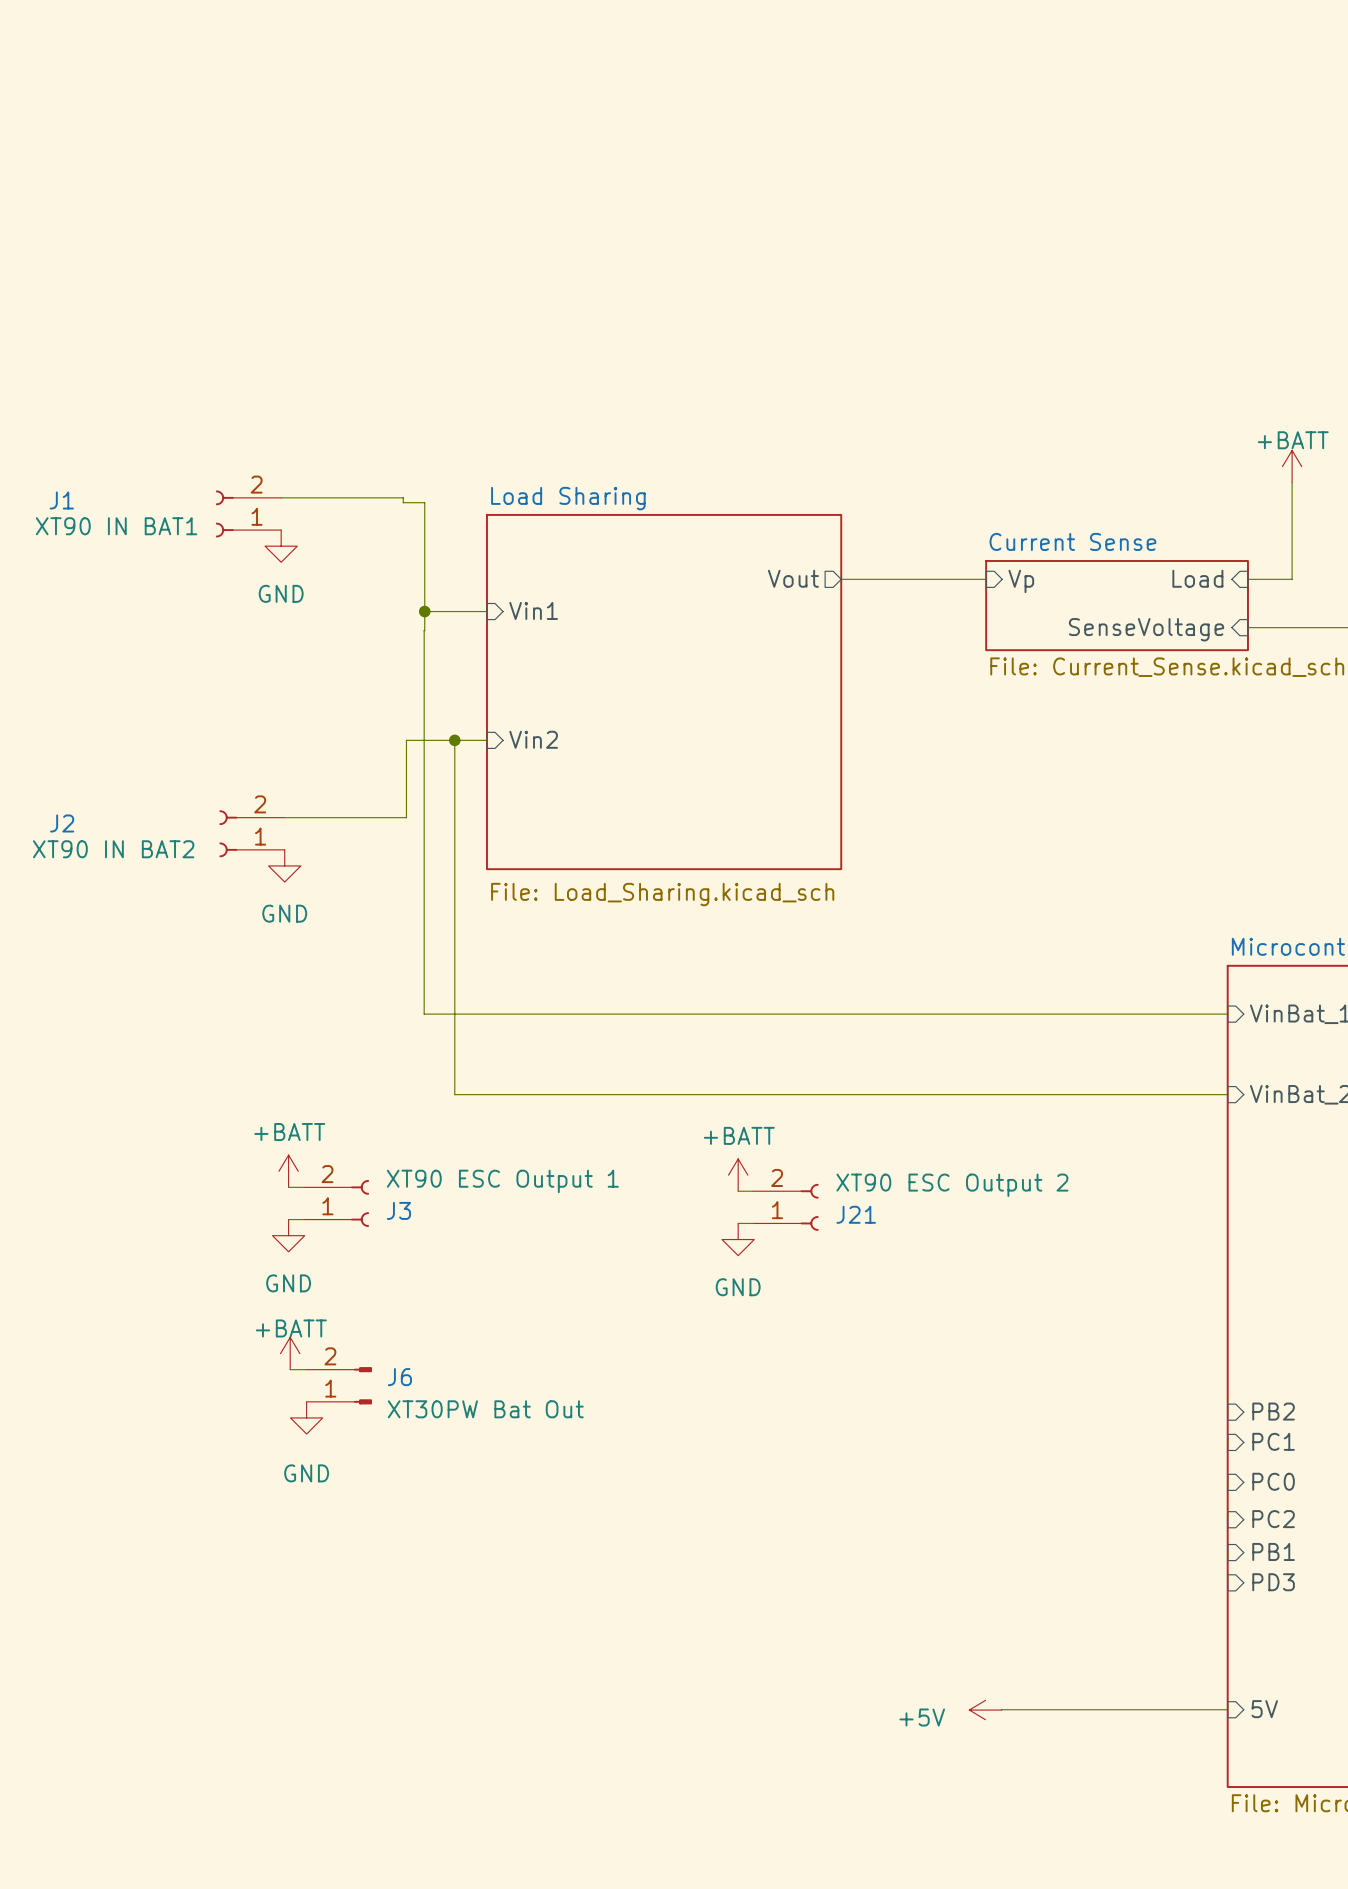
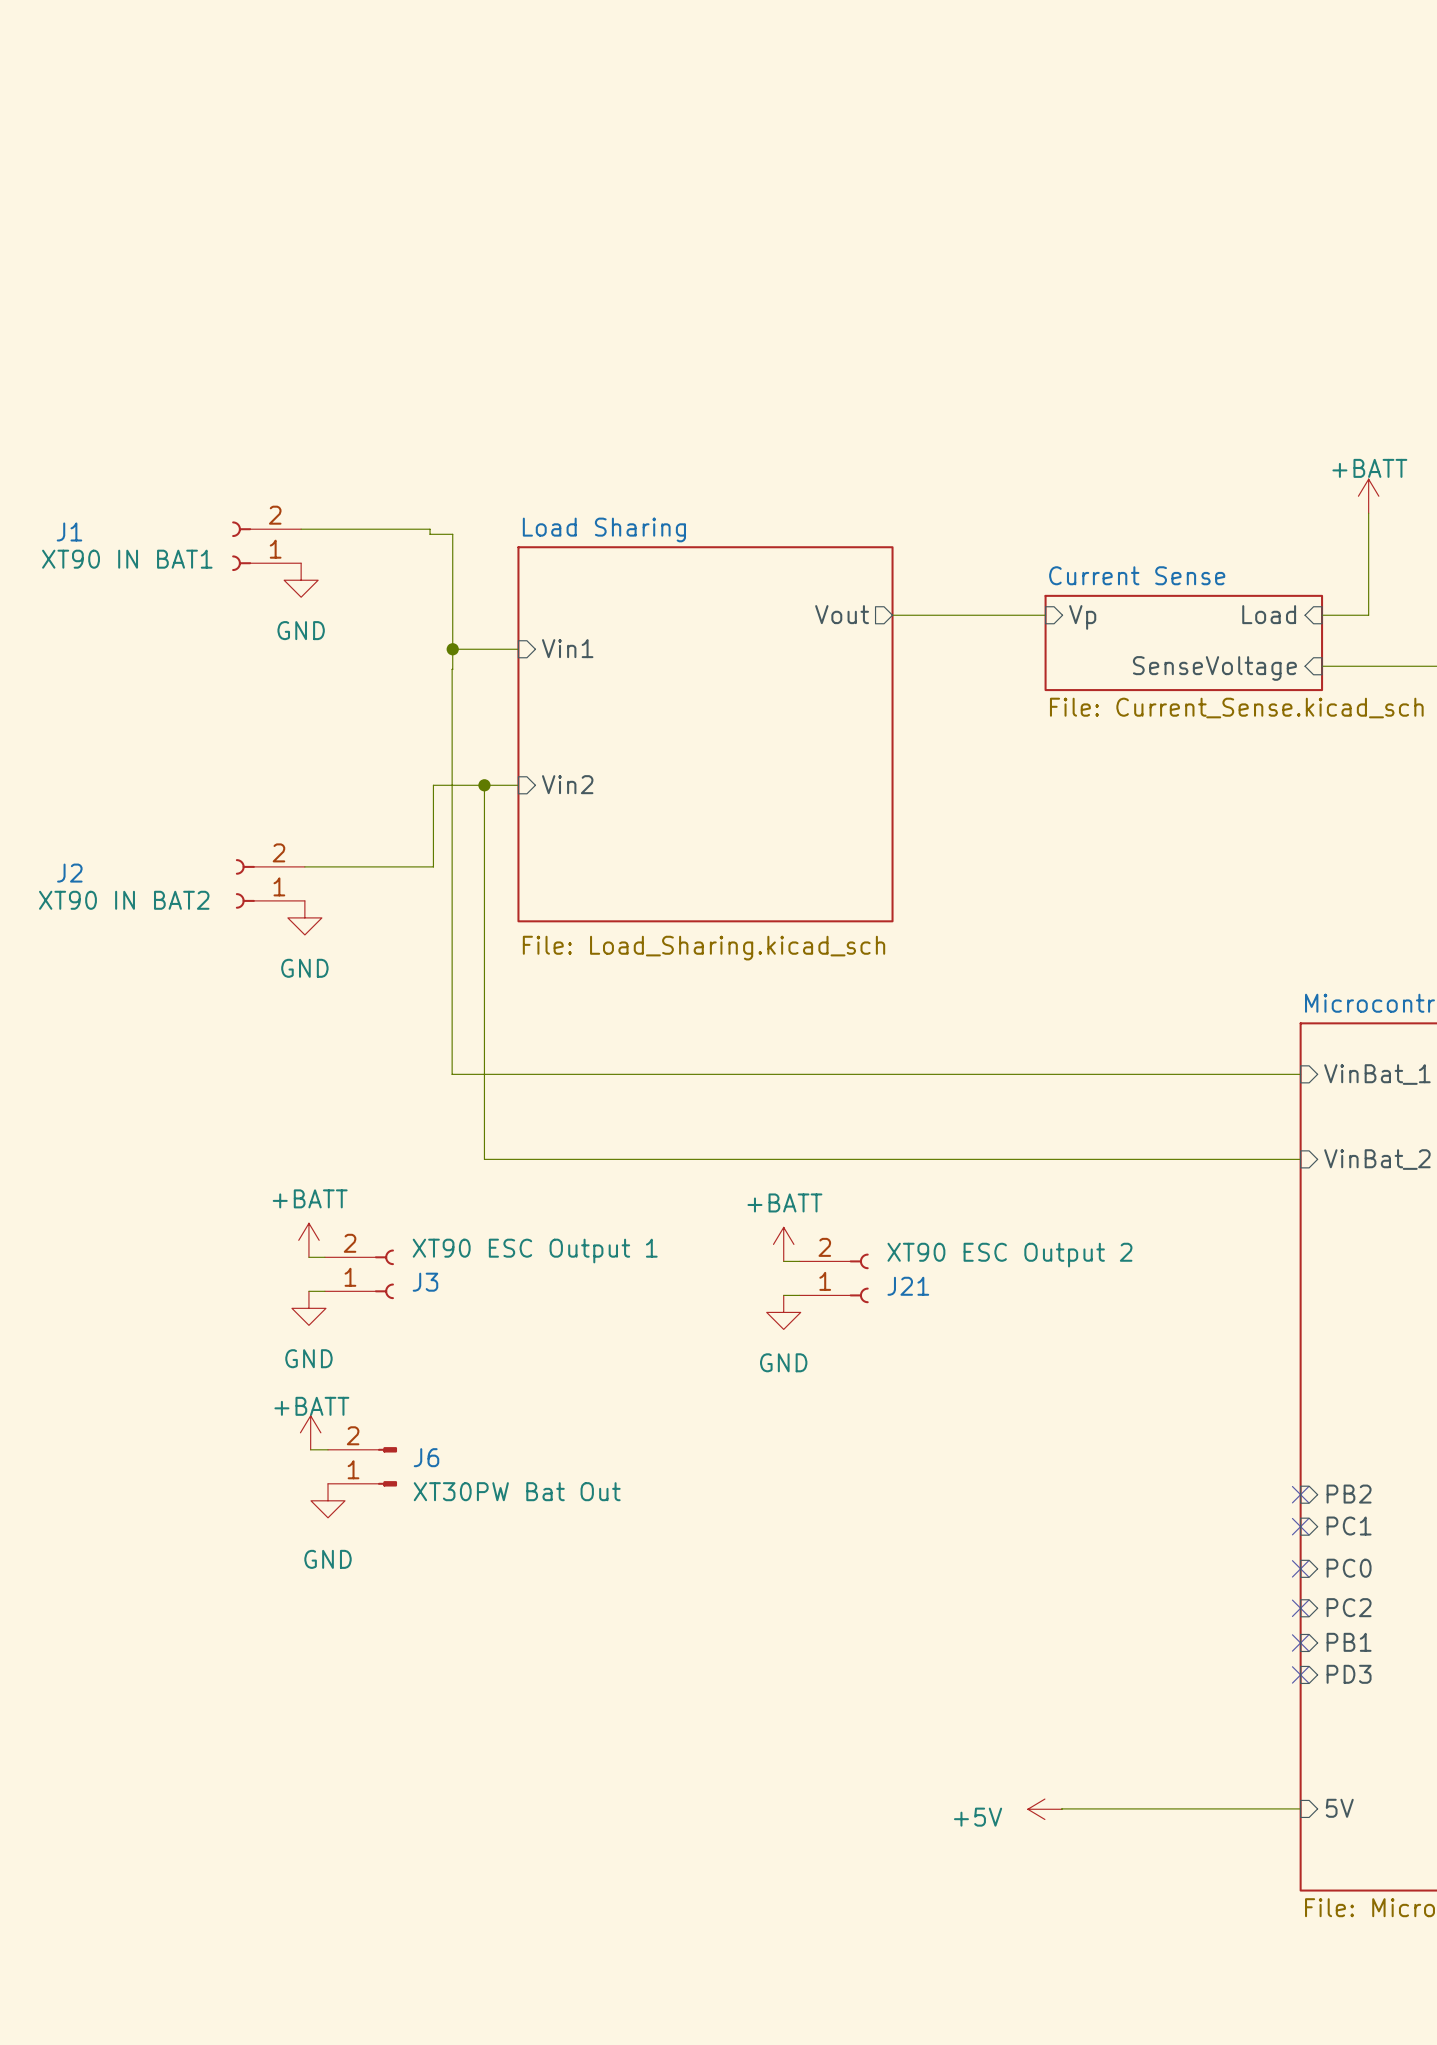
no-connect mark: none -> (1300, 1494)
no-connect mark: none -> (1300, 1526)
no-connect mark: none -> (1300, 1568)
no-connect mark: none -> (1300, 1608)
no-connect mark: none -> (1300, 1642)
no-connect mark: none -> (1300, 1674)

